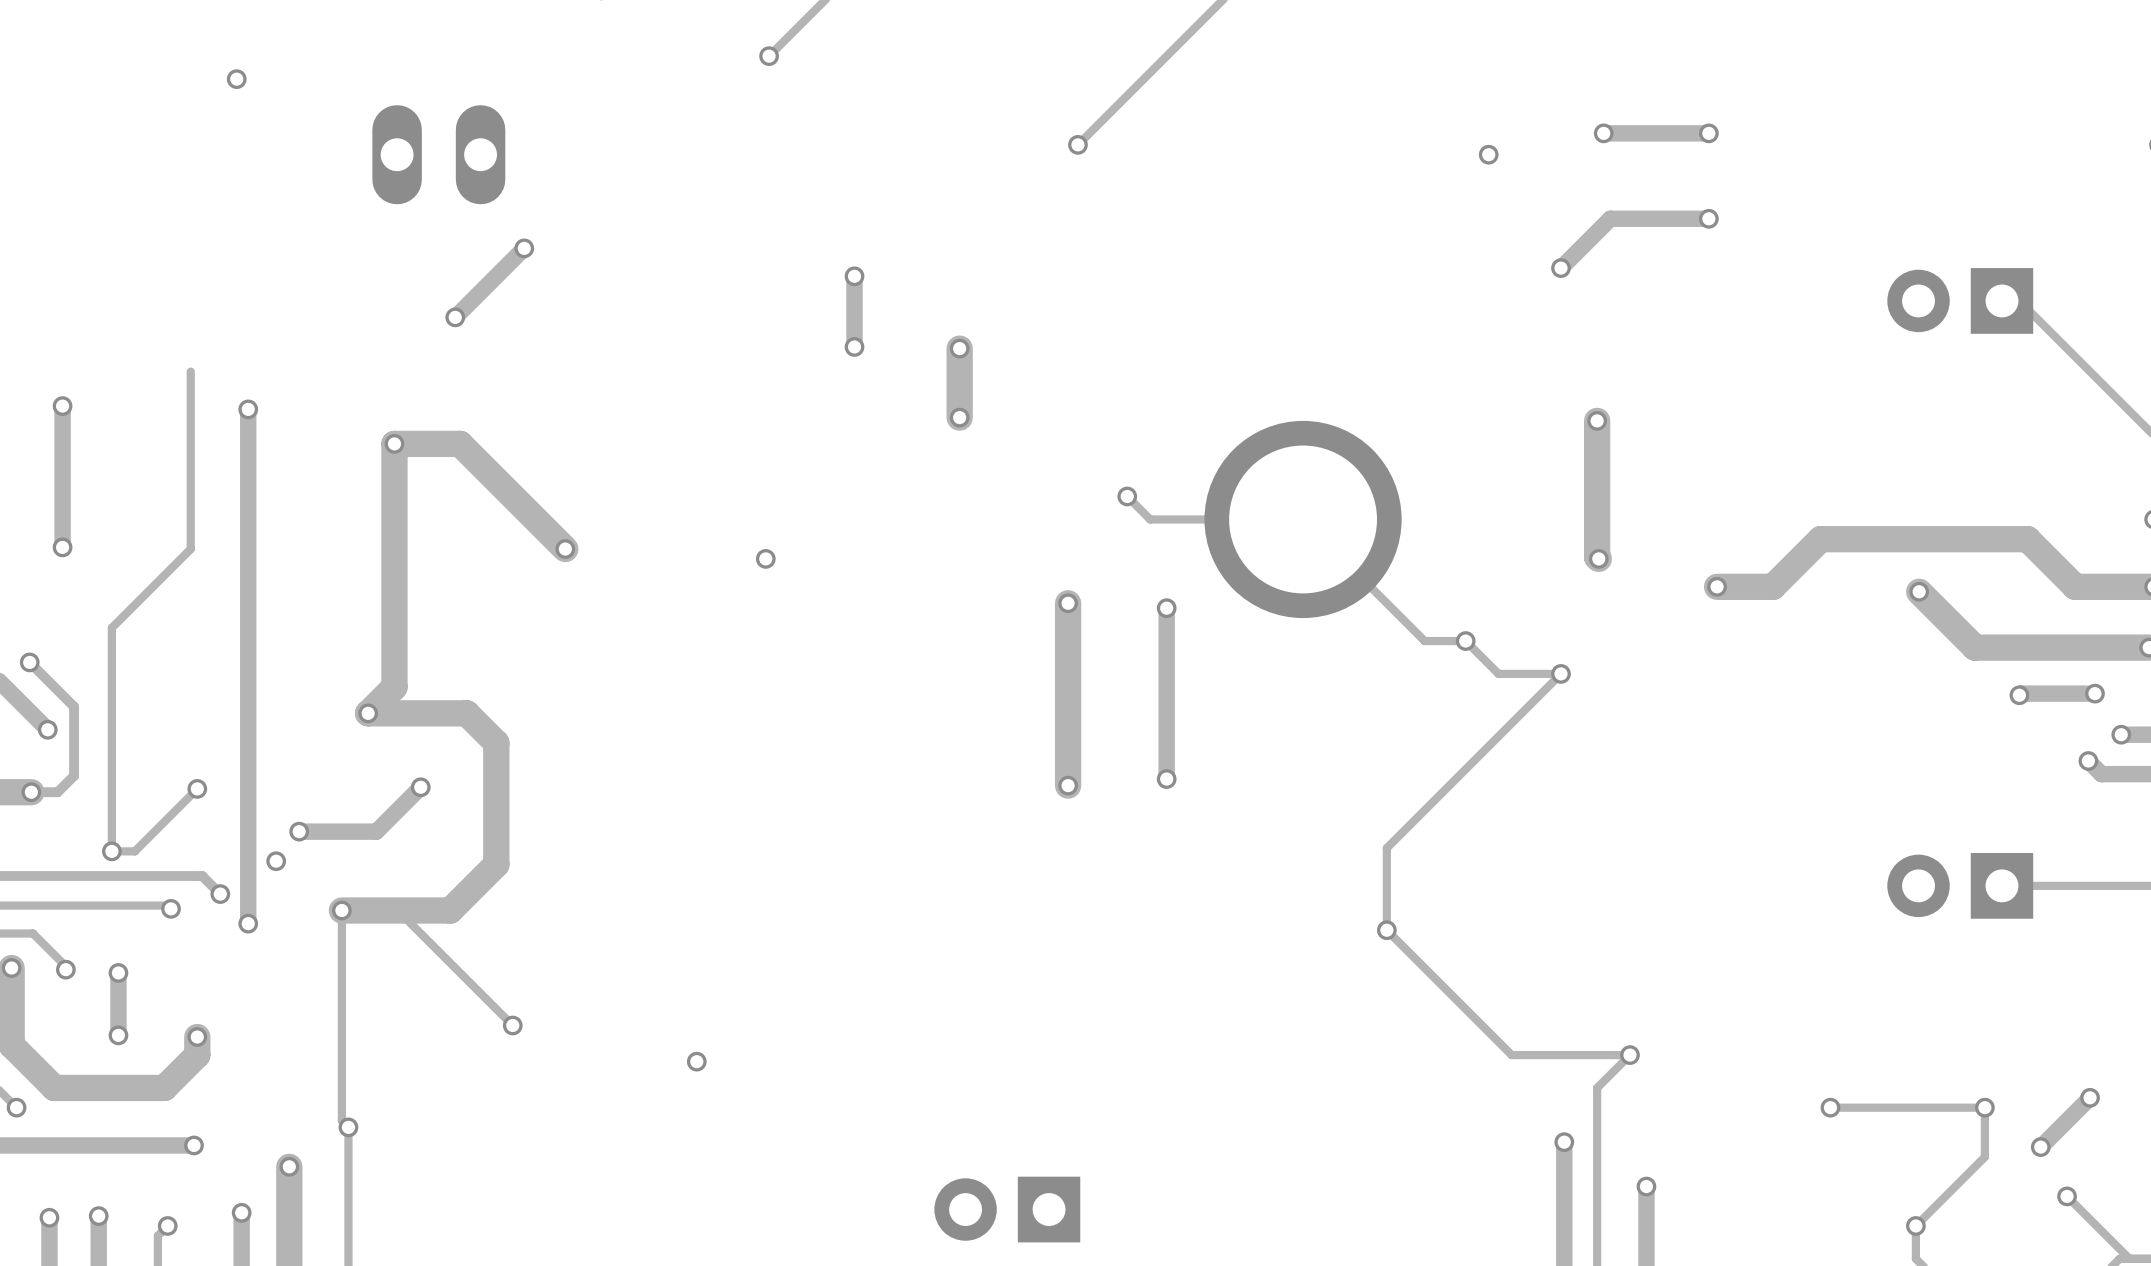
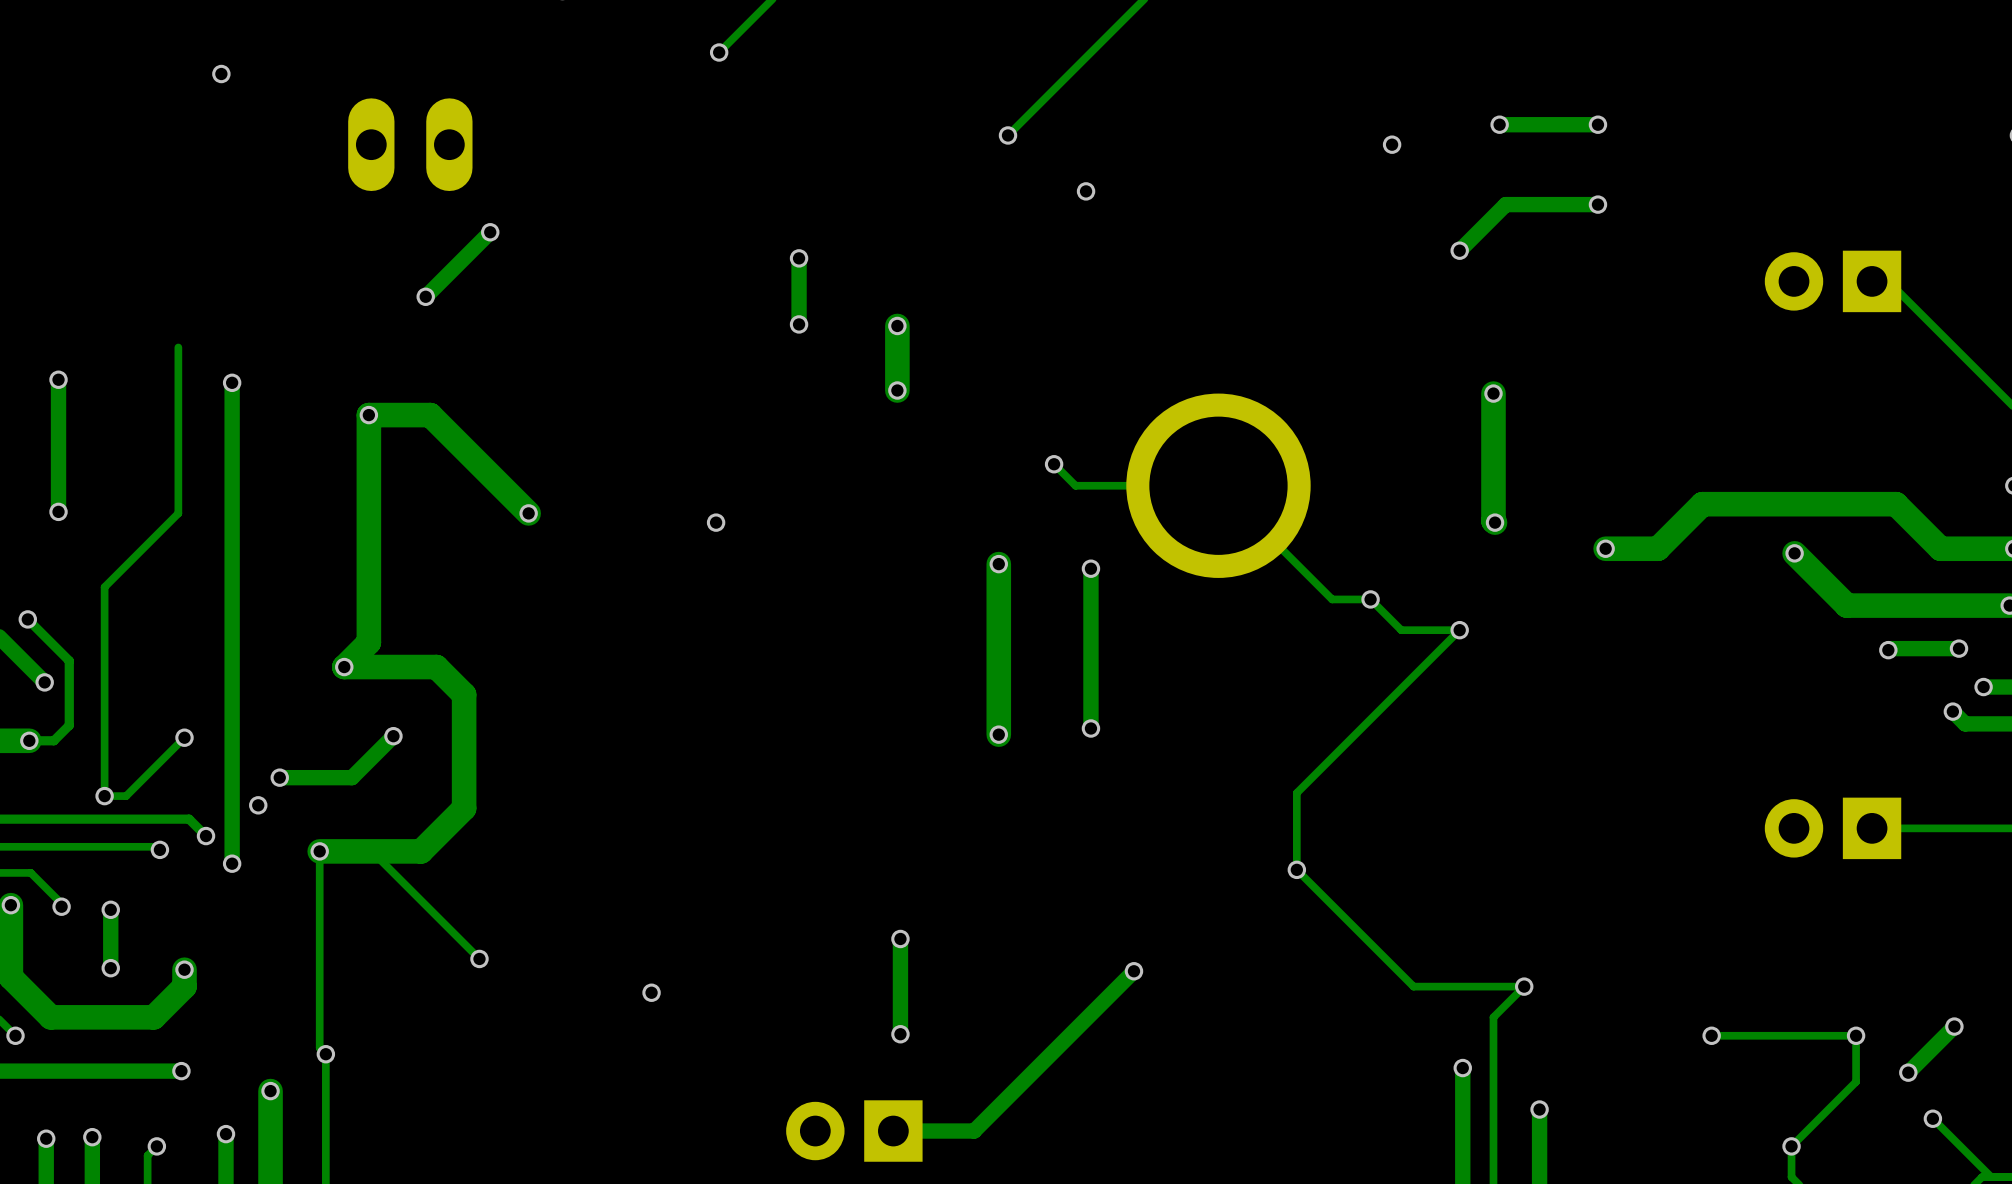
via: none -> (1086, 191)
track: none -> (900, 938) (900, 1034)
via: none -> (900, 938)
track: none -> (1133, 971) (974, 1131) (893, 1131)
via: none -> (1133, 971)
via: none -> (900, 1034)
part position: (1007, 1209) -> (854, 1131)

